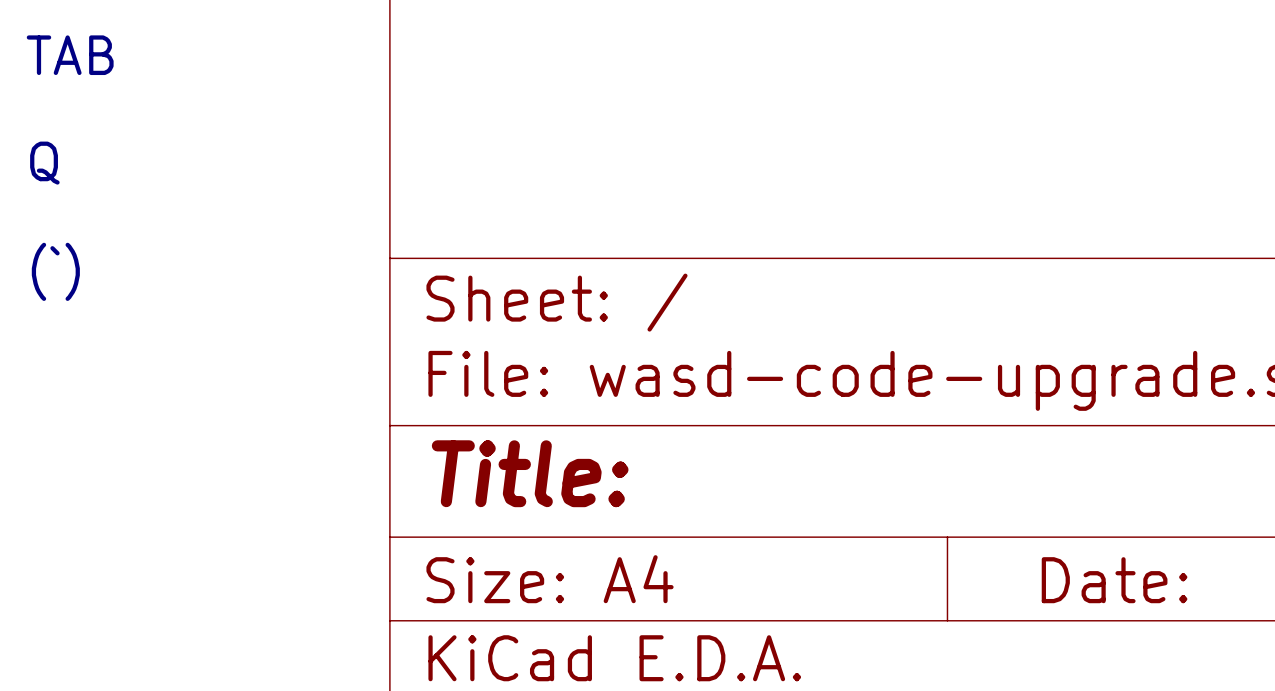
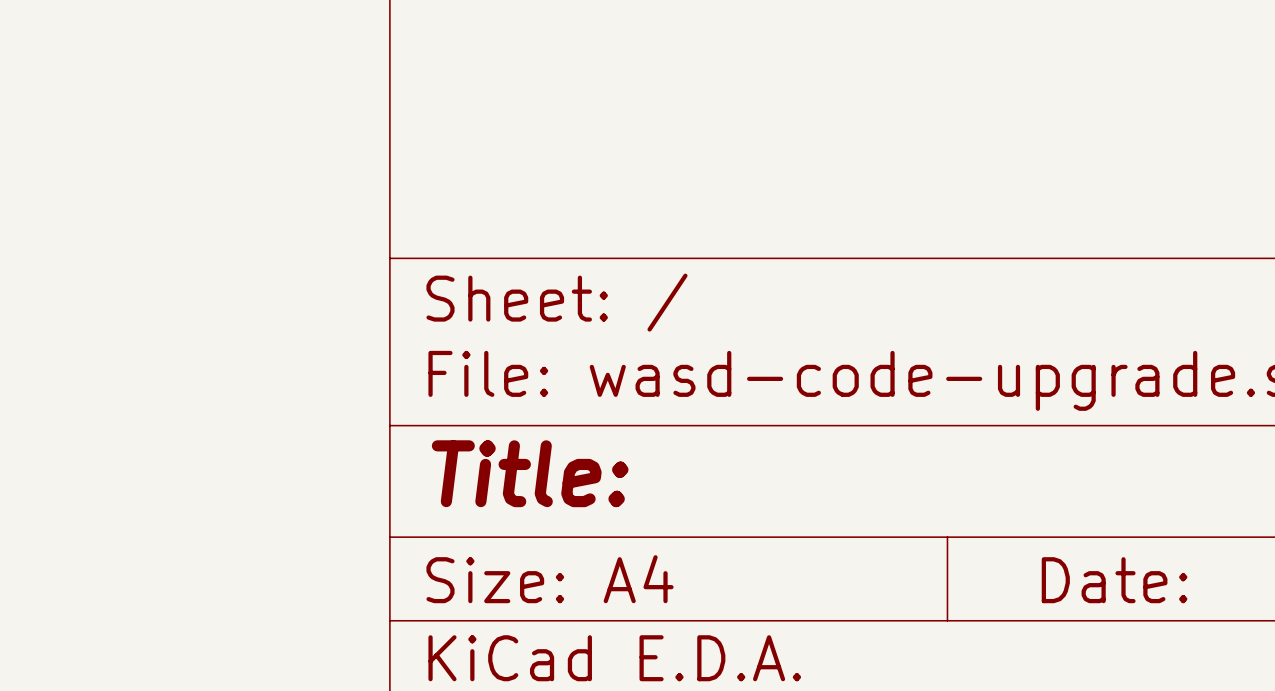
text: TAB (70, 55) -> none
text: Q (44, 163) -> none
text: (`) (55, 271) -> none

